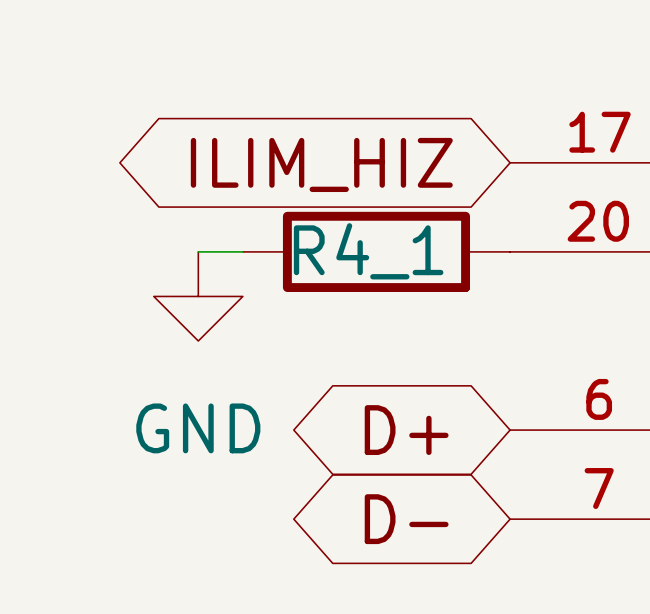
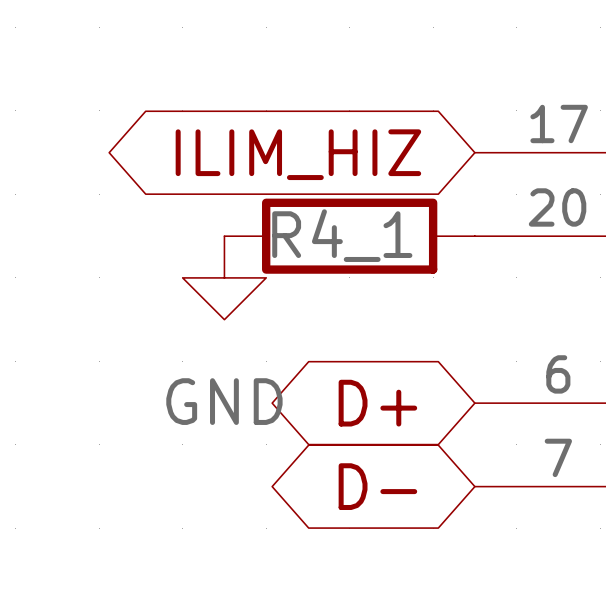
wire: (198, 251) (242, 251) -> none
power symbol position: GND (198, 296) -> GND (224, 277)

